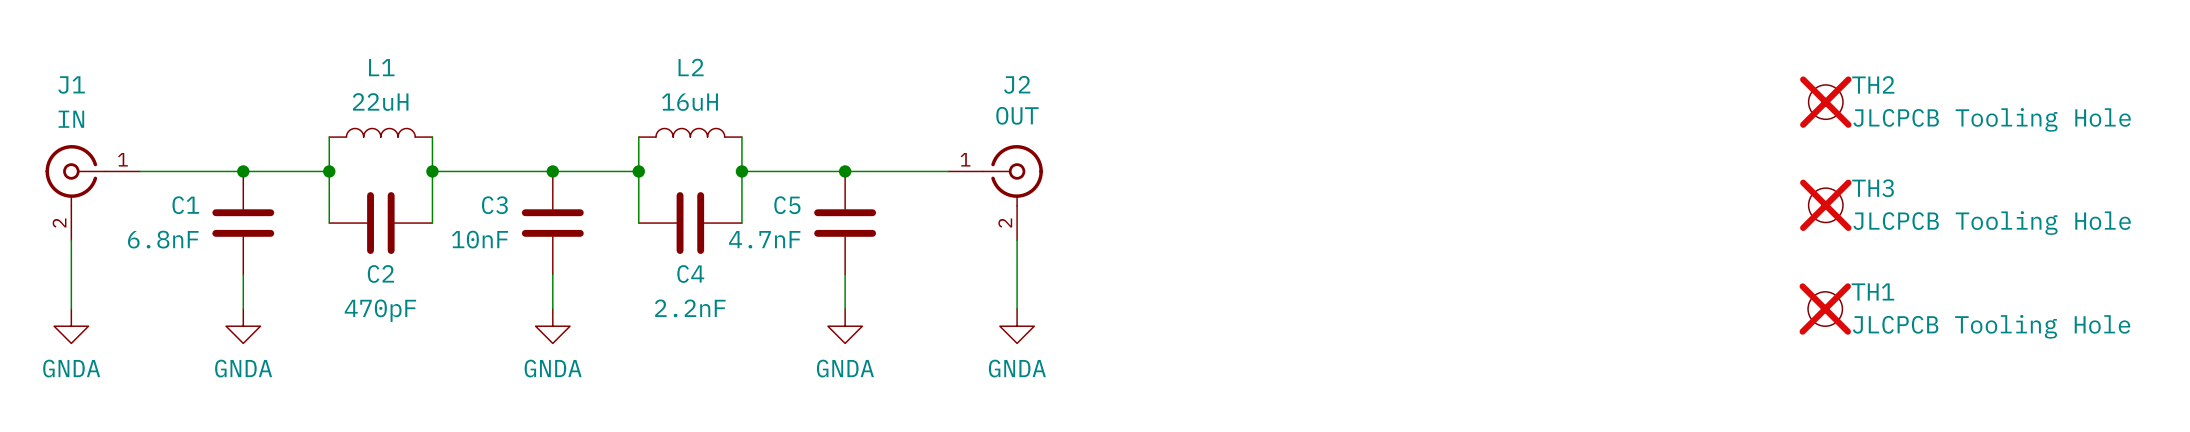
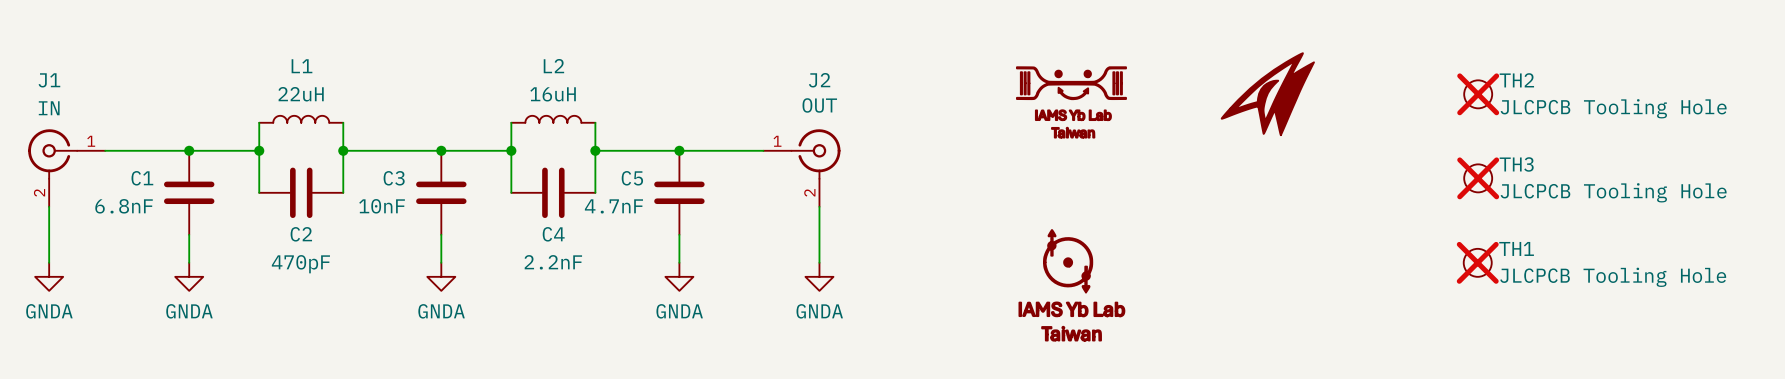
part: none -> (1267, 94)
part: none -> (1071, 102)
part: none -> (1071, 285)

